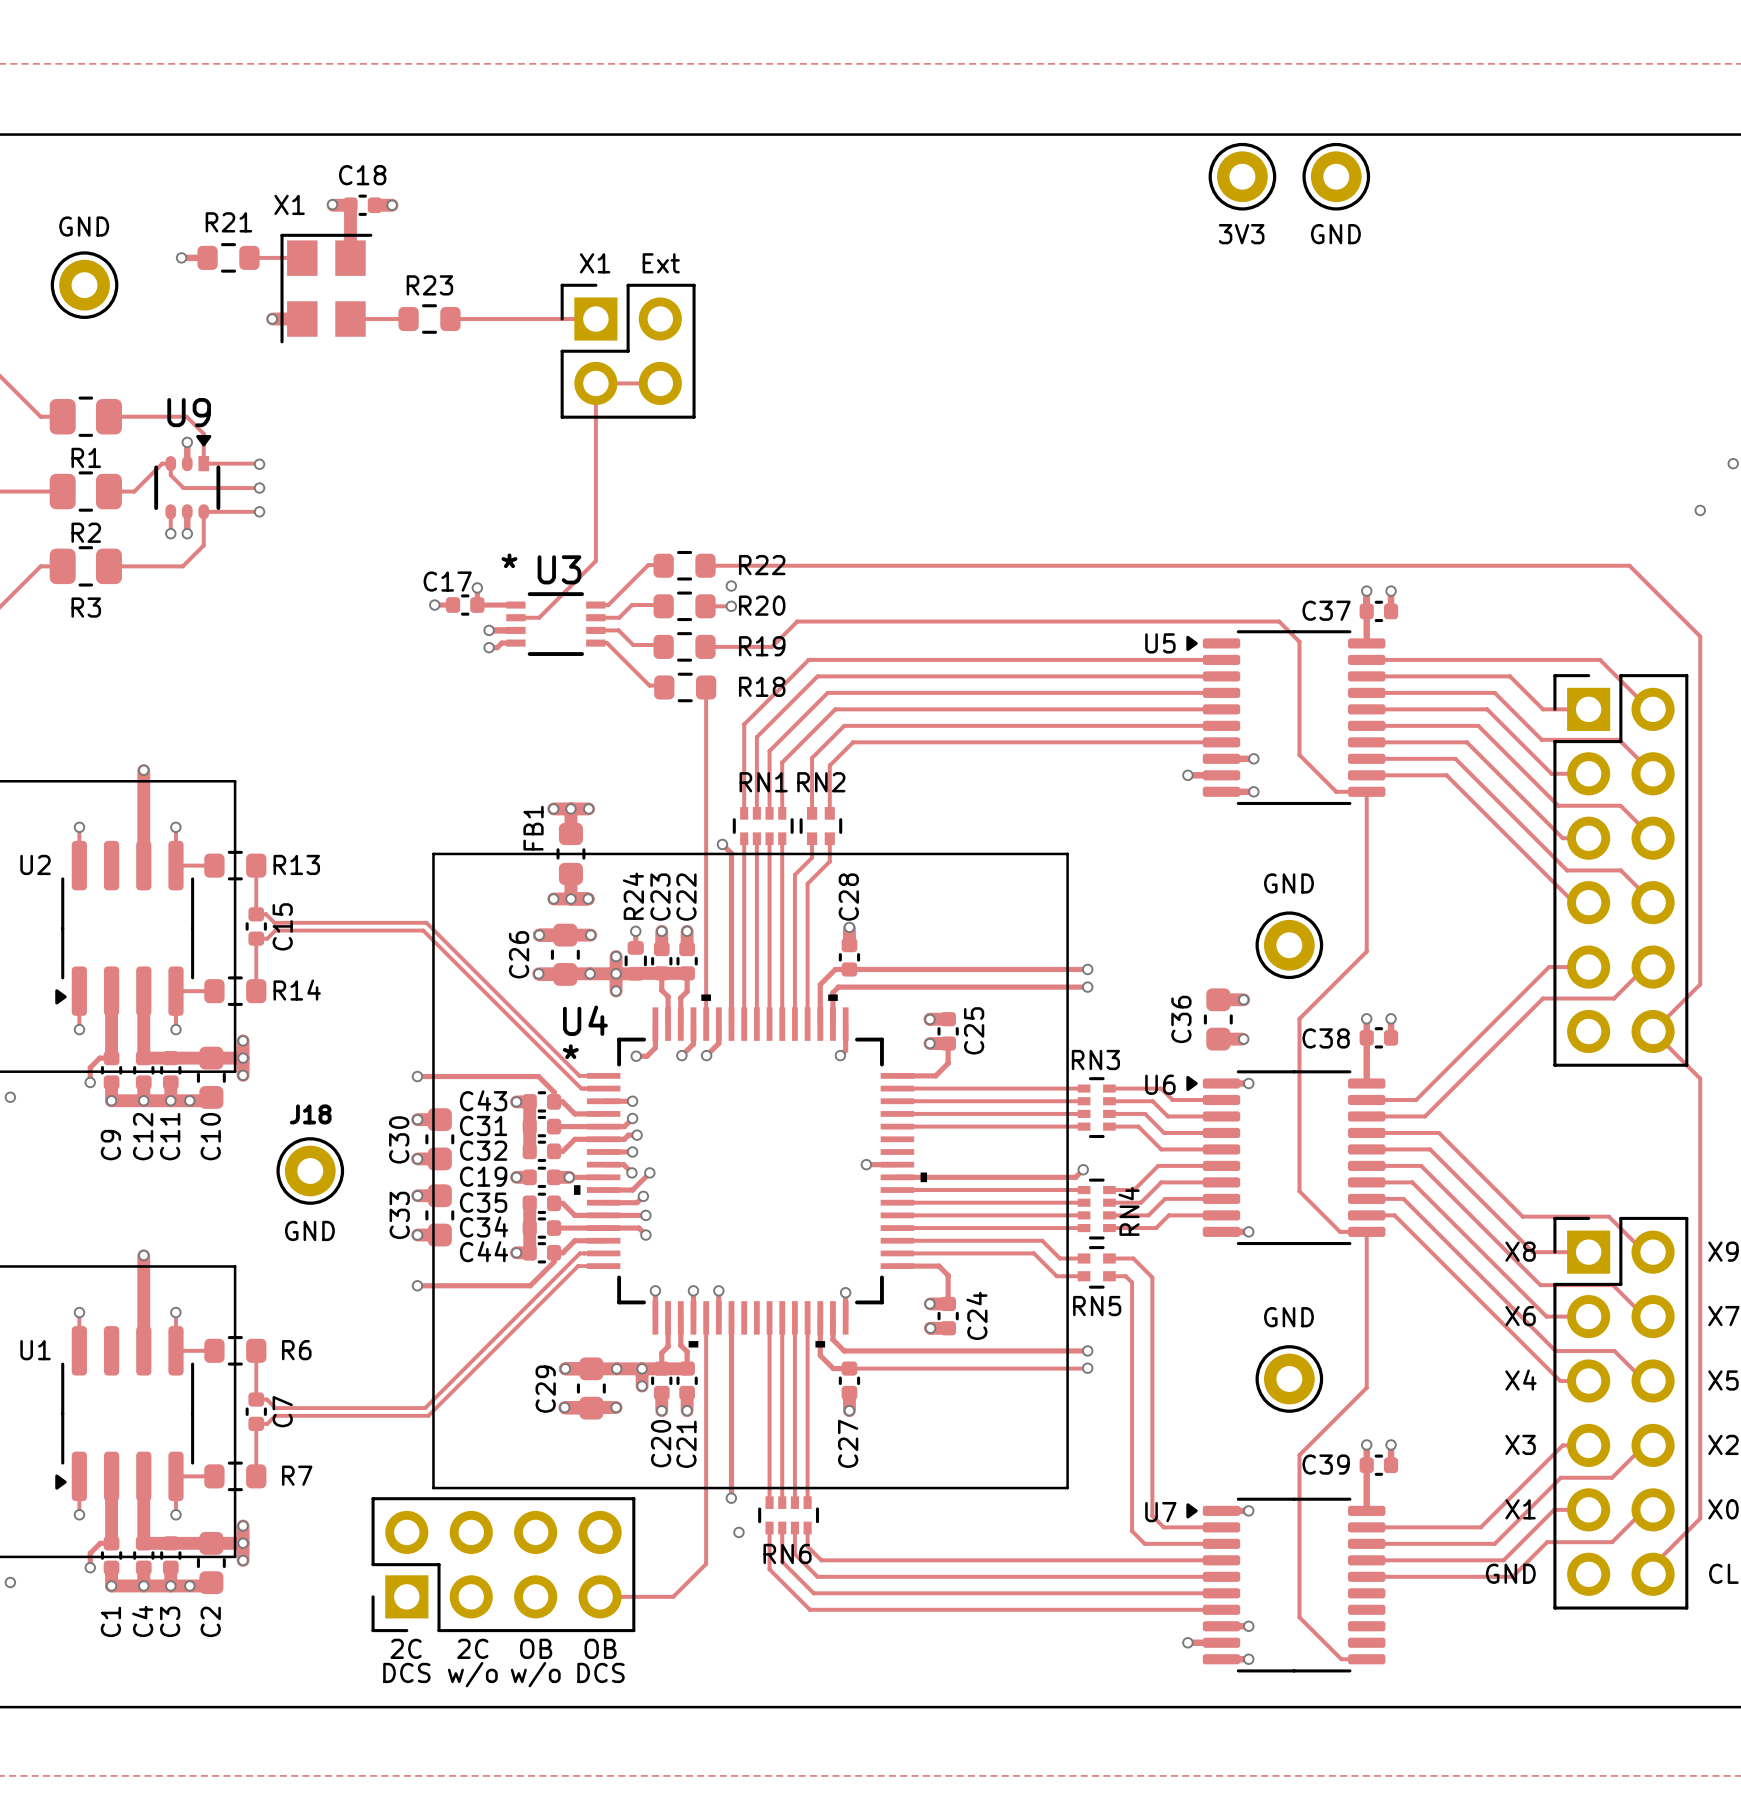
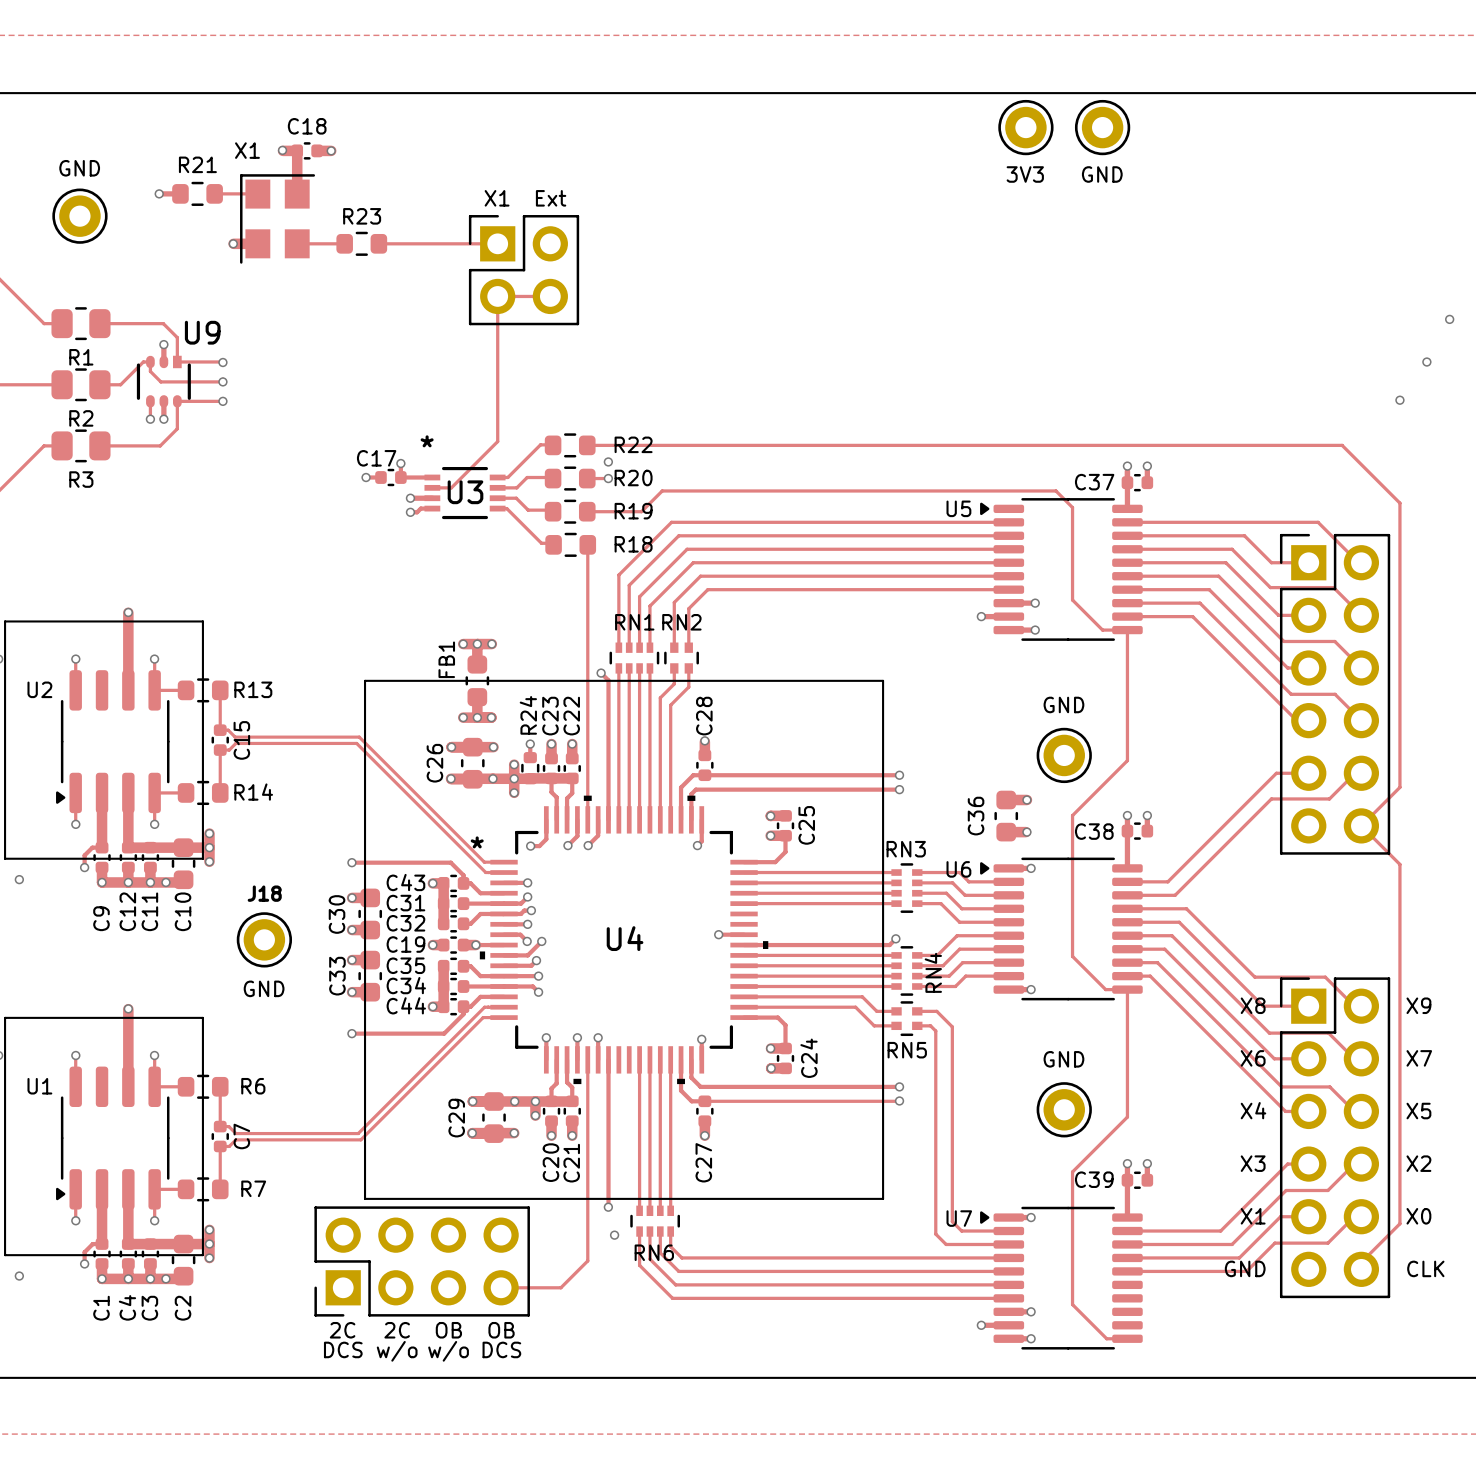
U9 footprint: [154, 434, 221, 520] -> [136, 355, 191, 408]
U3 name position: U3 (559, 569) -> U3 (465, 492)
U4 name position: U4 (585, 1020) -> U4 (625, 938)

